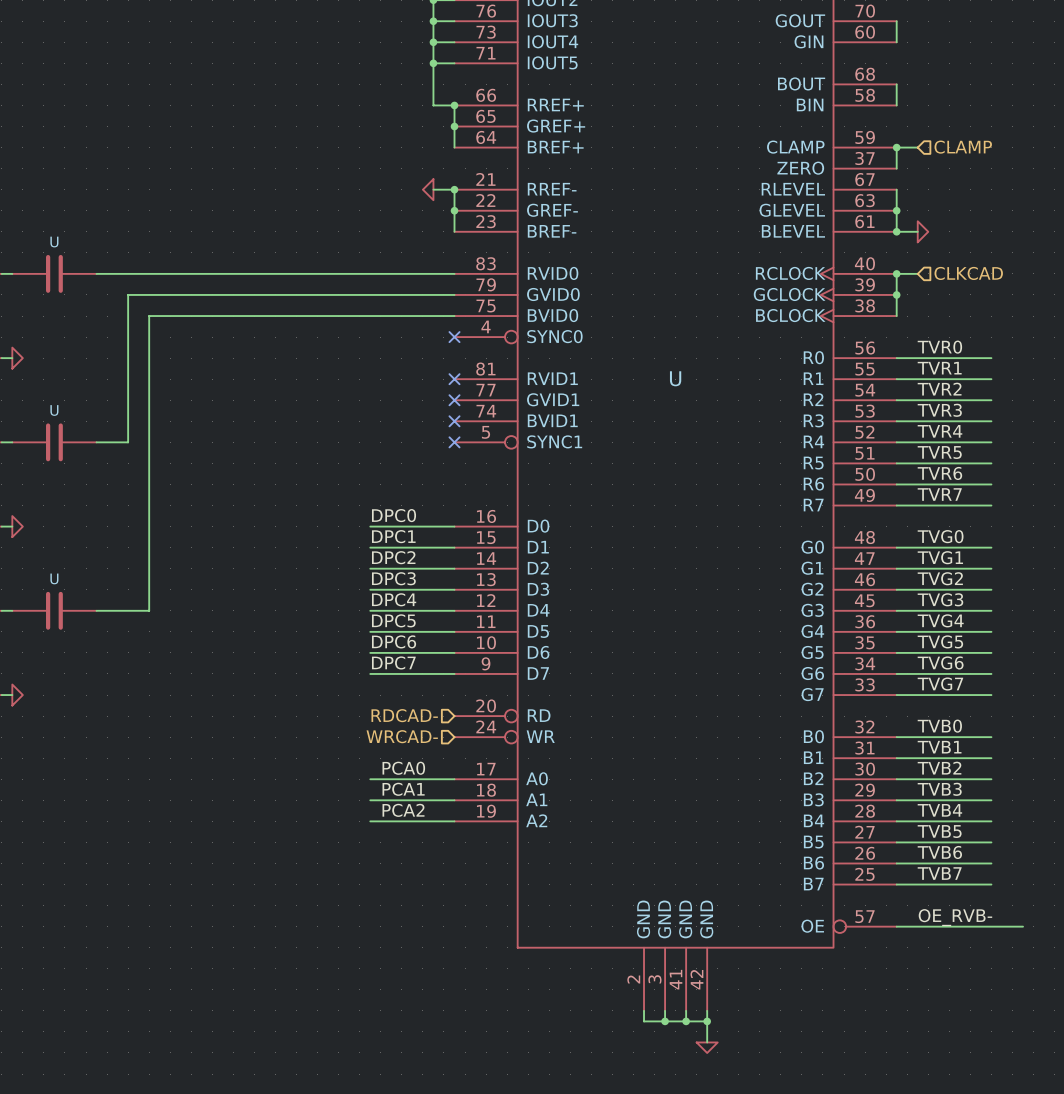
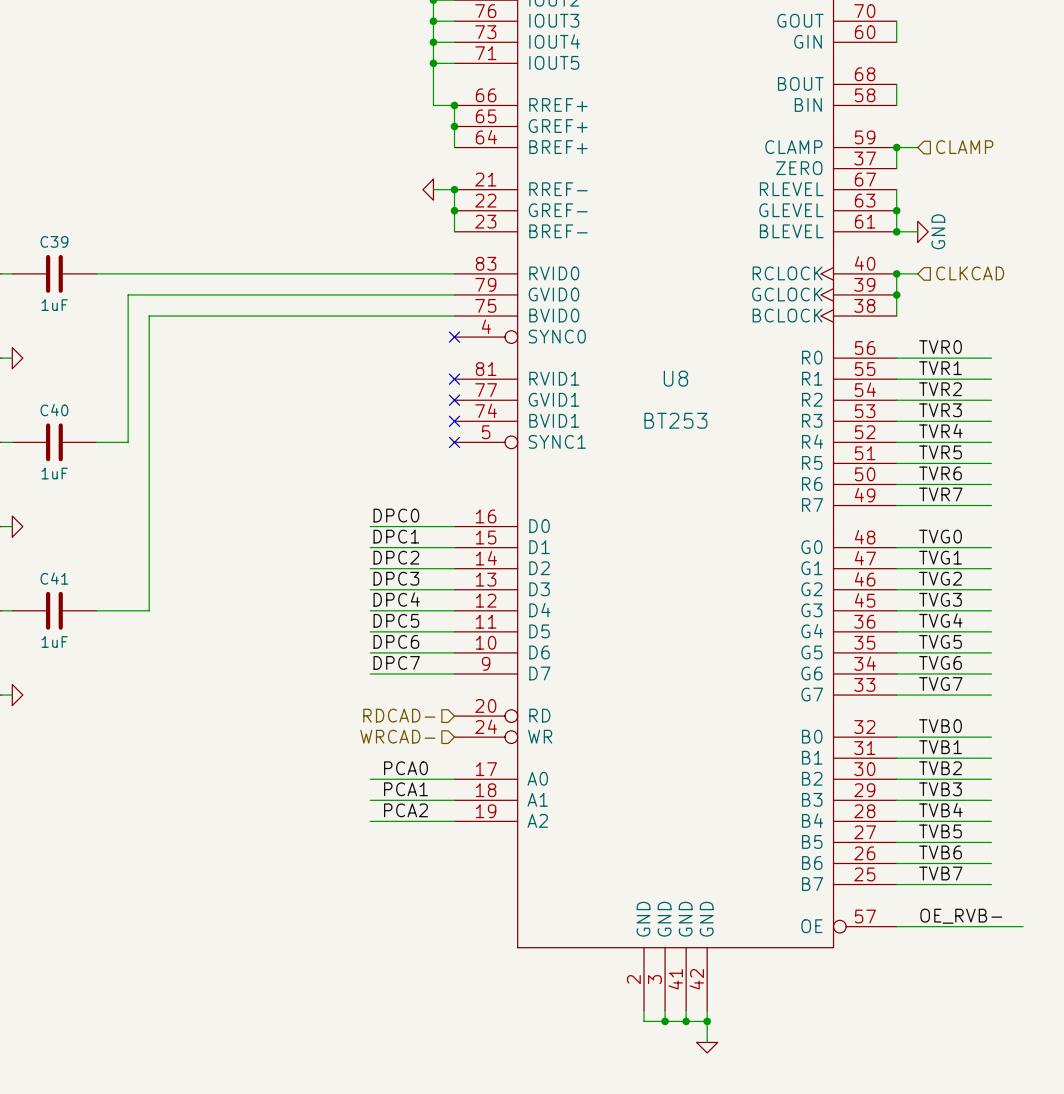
power symbol text: none -> GND (938, 231)
U name: U (54, 242) -> C39 (54, 241)
U value: none -> 1uF (54, 305)
U name: U (675, 378) -> U8 (675, 378)
U name: U (54, 410) -> C40 (54, 410)
U value: none -> BT253 (675, 420)
U value: none -> 1uF (54, 473)
U name: U (54, 578) -> C41 (54, 578)
U value: none -> 1uF (54, 642)

